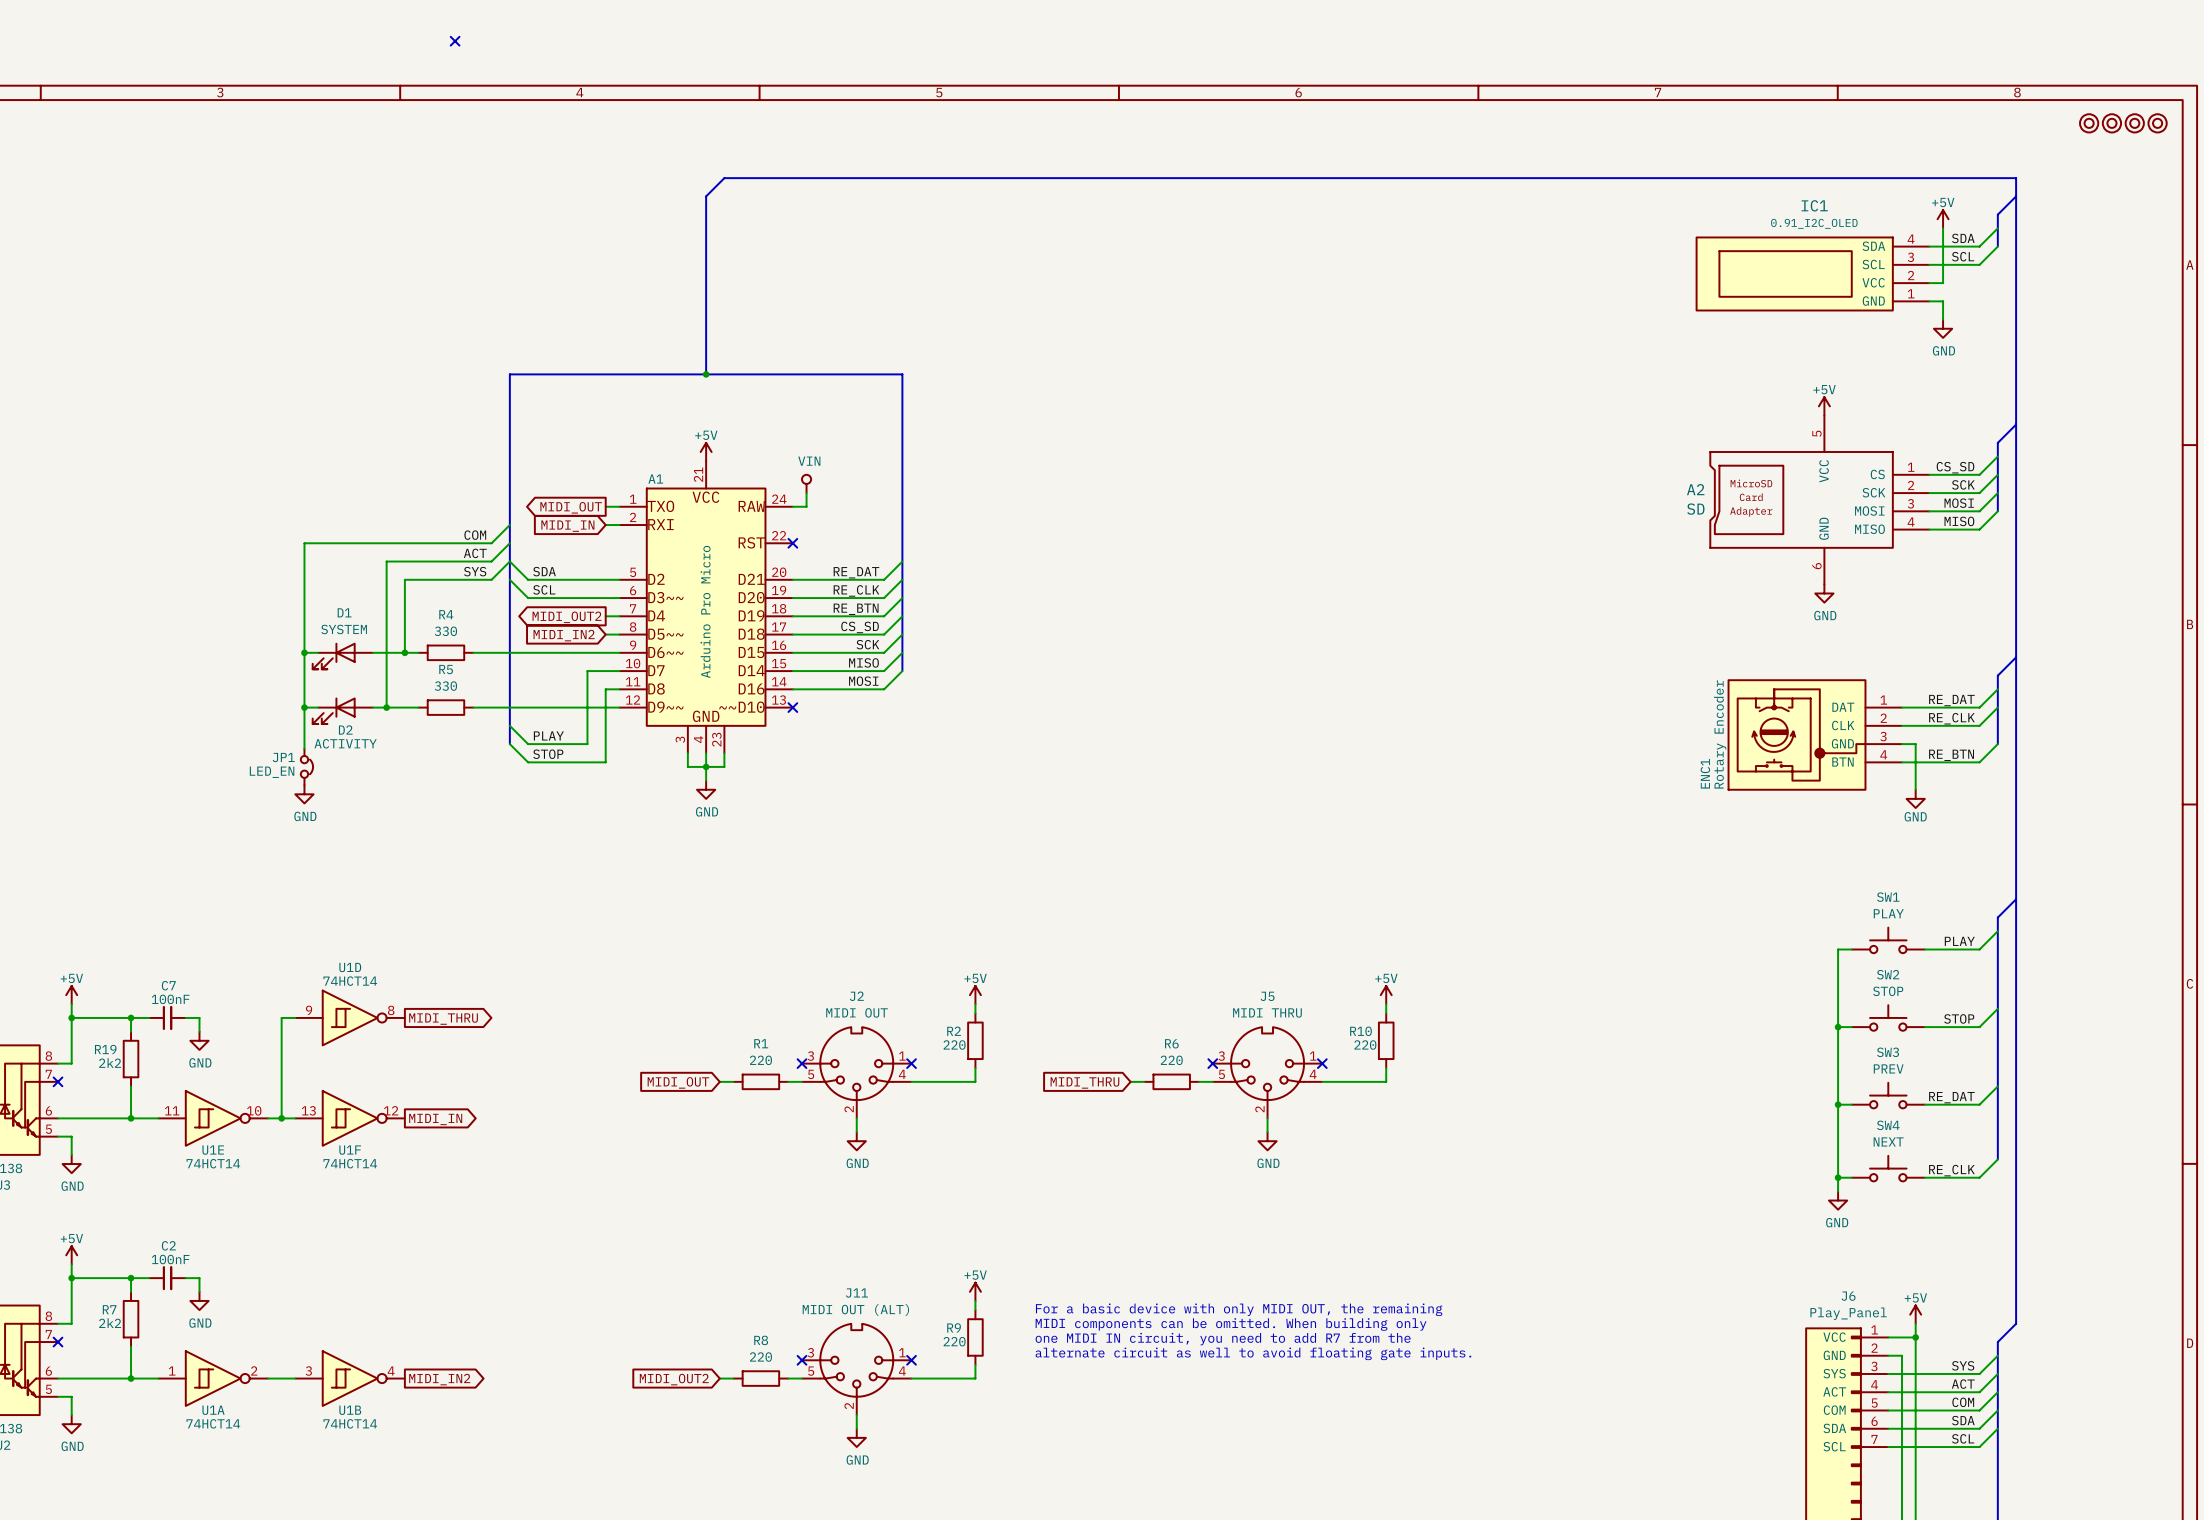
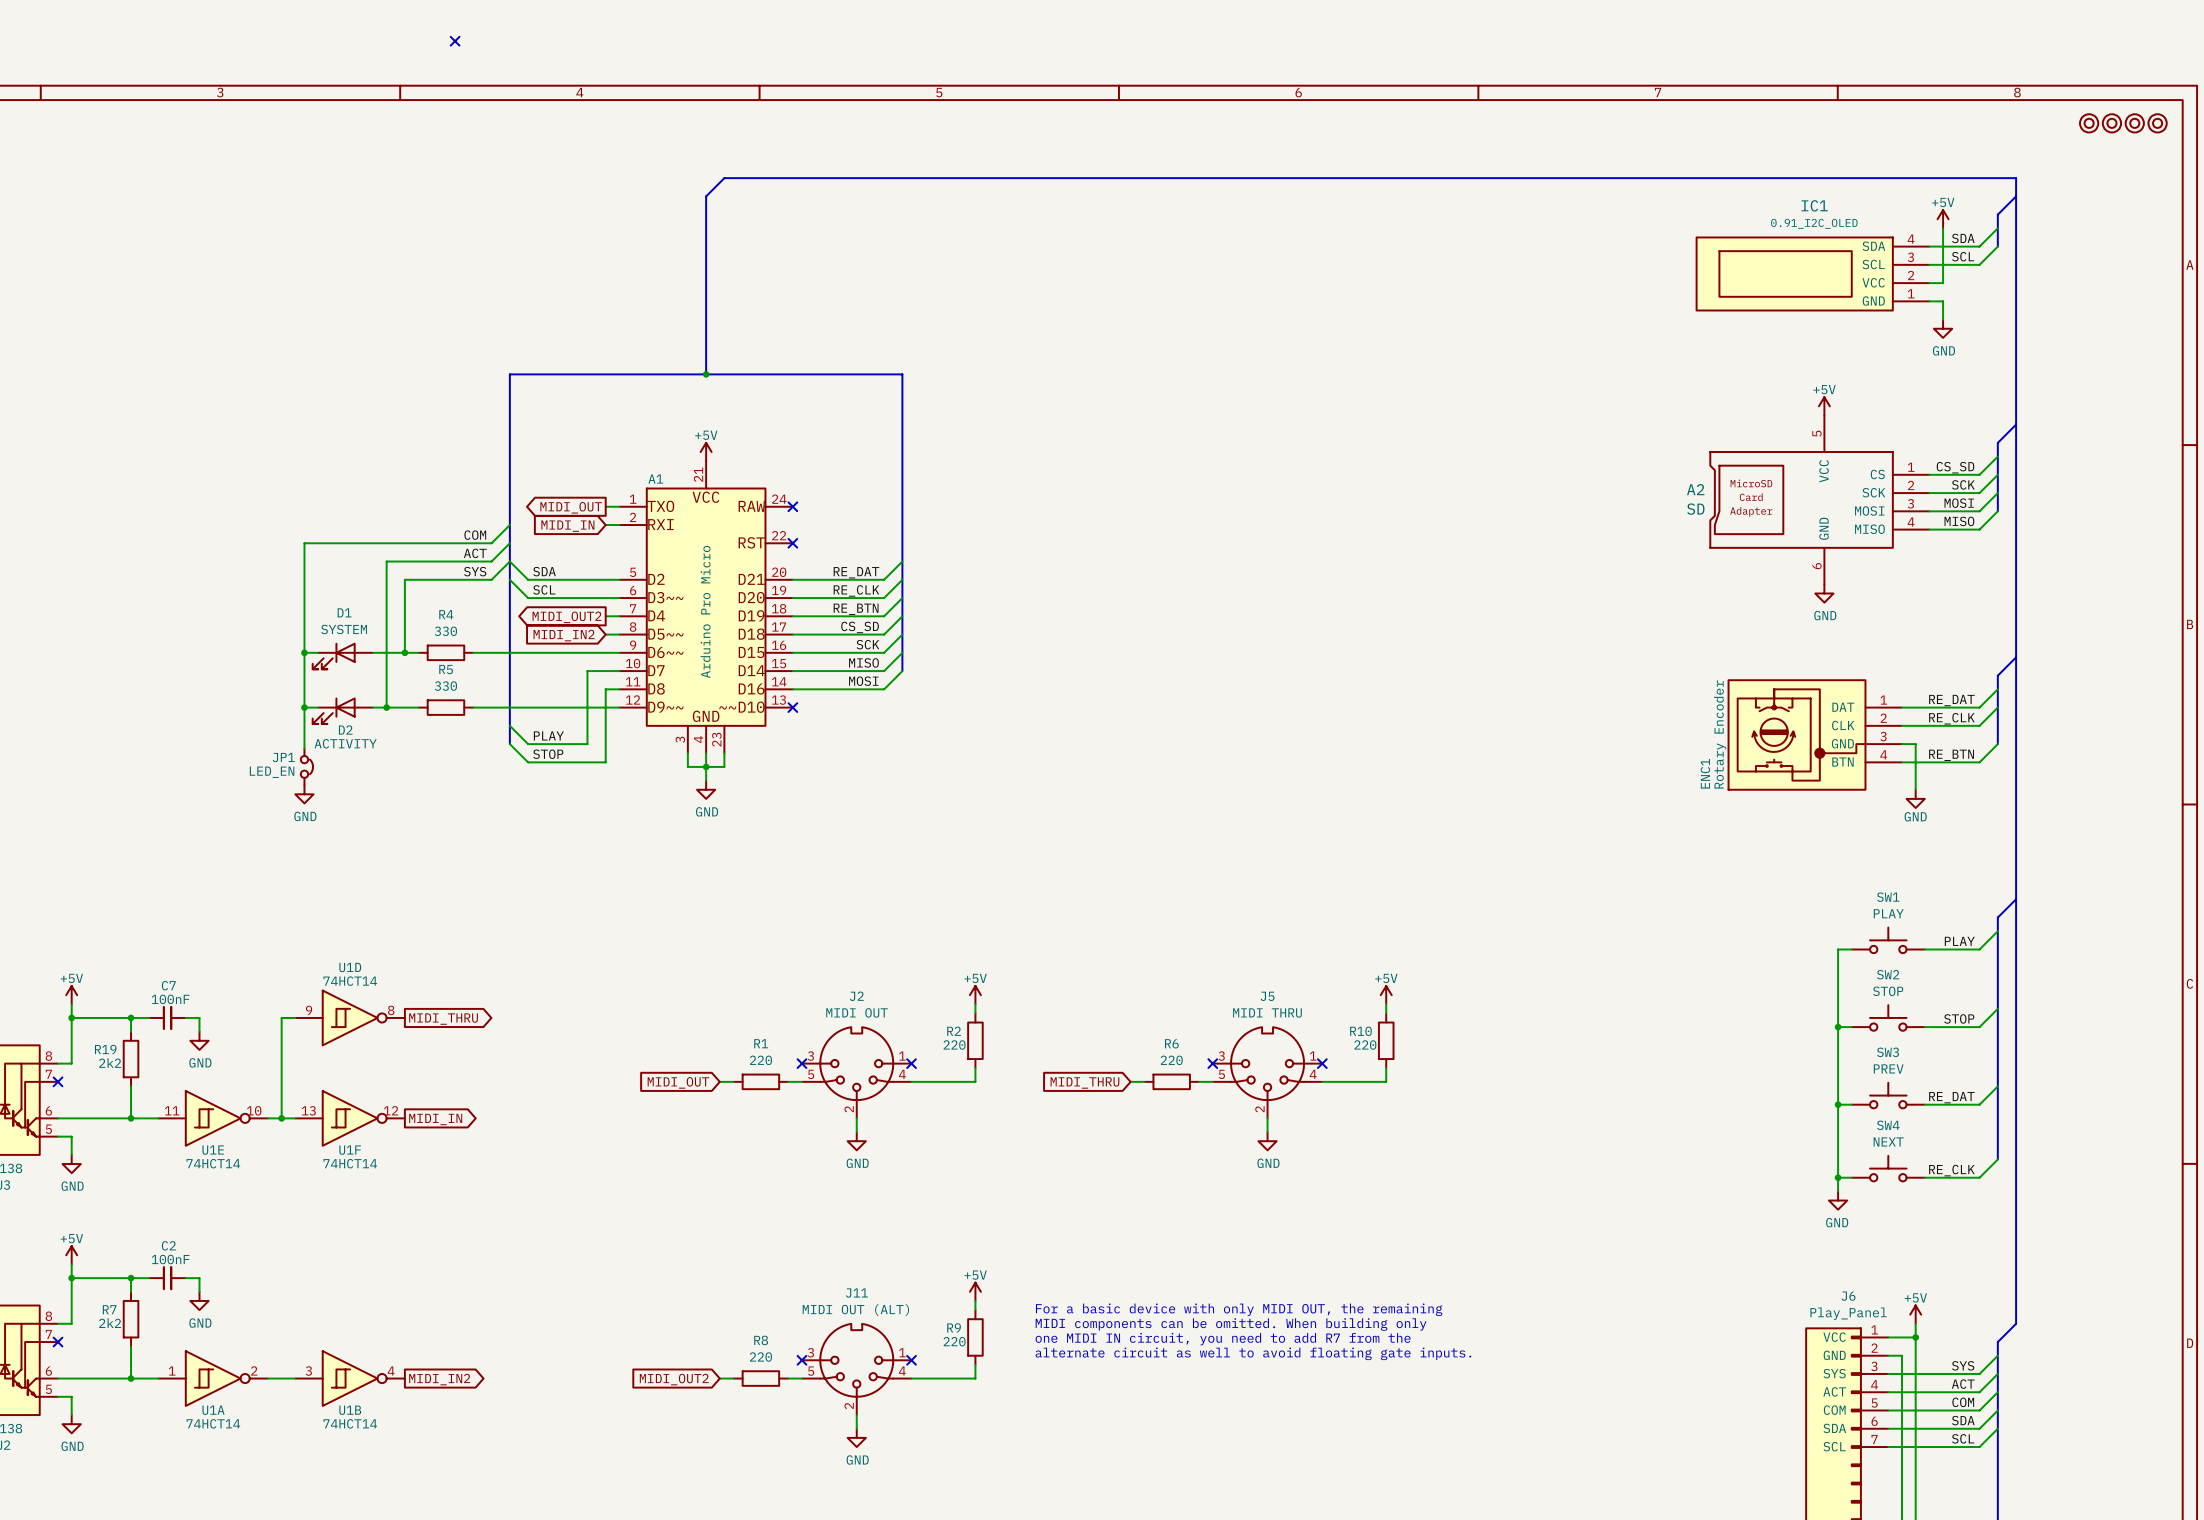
power symbol: VIN (806, 483) -> none
wire: (806, 493) (806, 506) (792, 506) -> none
no-connect mark: none -> (792, 506)

